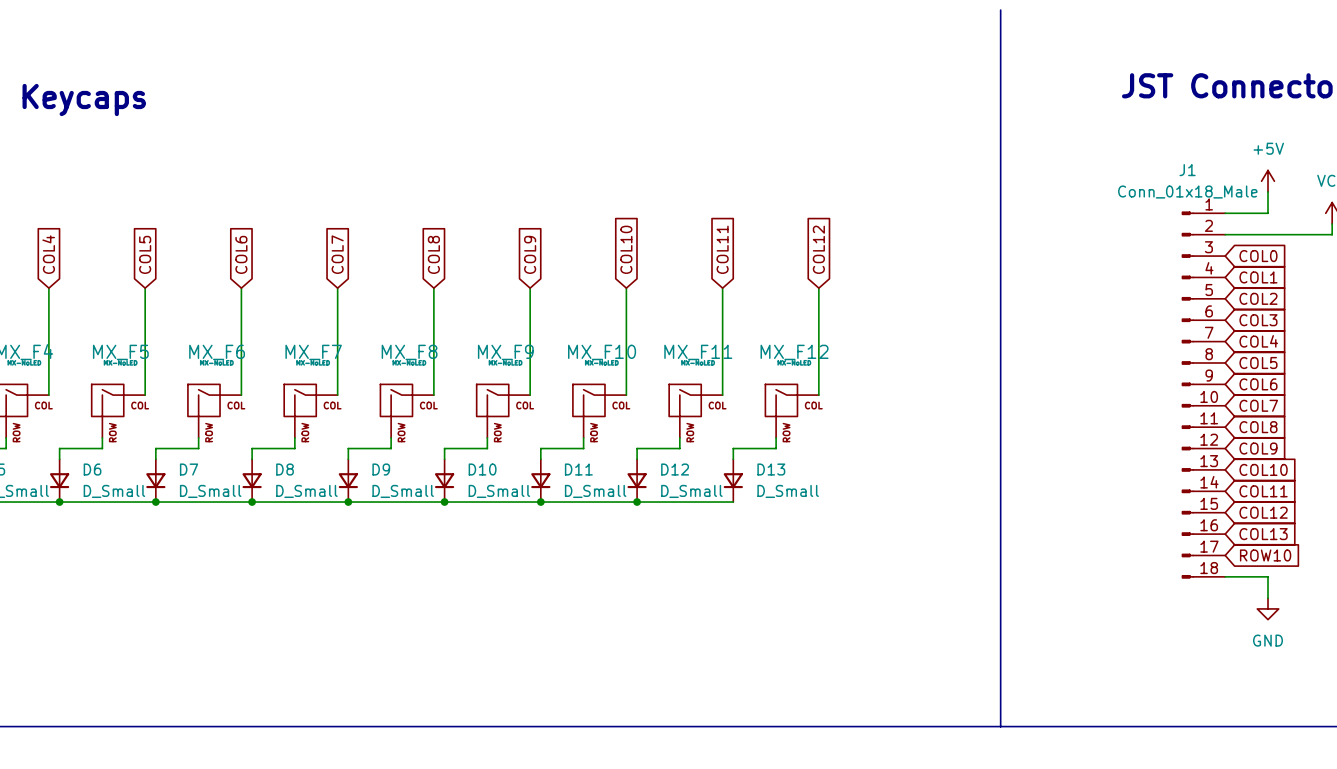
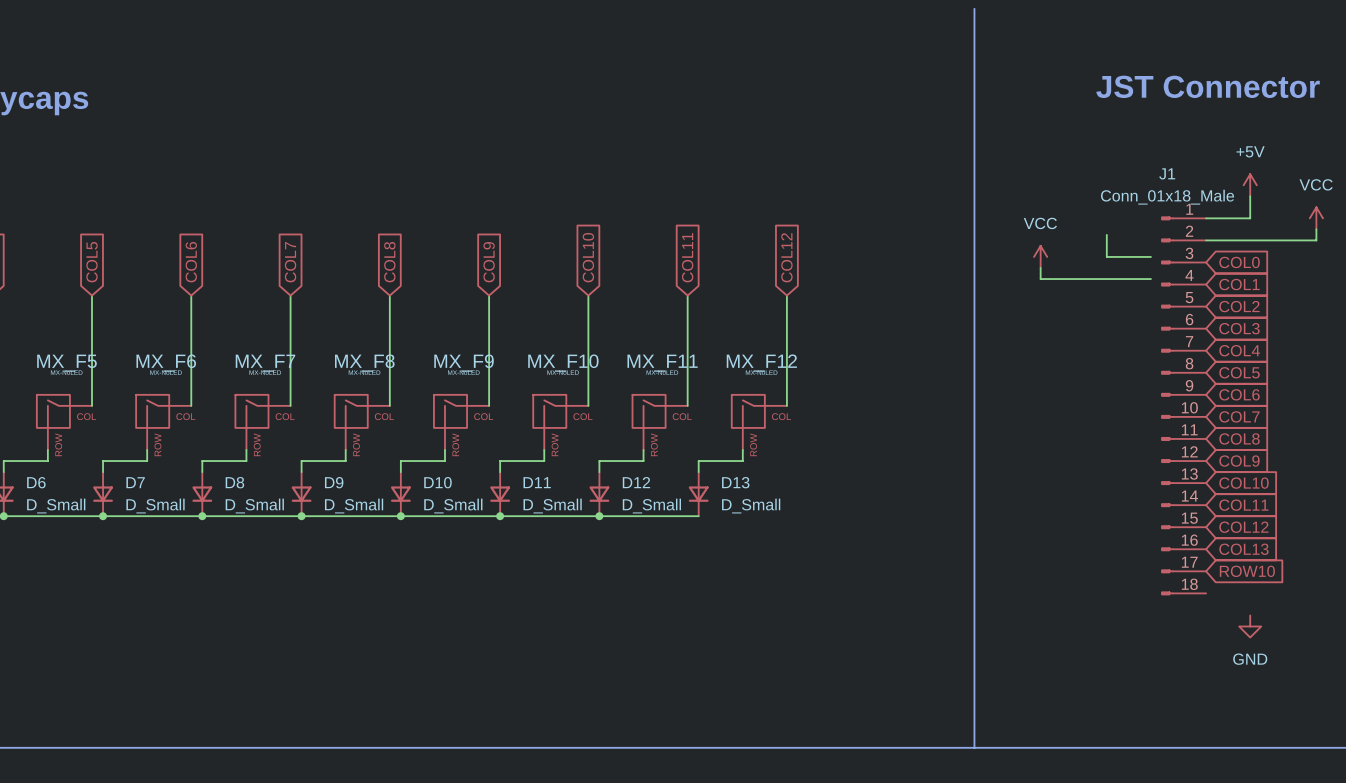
wire: none -> (1106, 234) (1106, 256) (1150, 256)
power symbol: none -> VCC (1040, 256)
wire: none -> (1040, 268) (1040, 279) (1150, 279)
wire: (1225, 576) (1268, 576) (1268, 598) -> none

